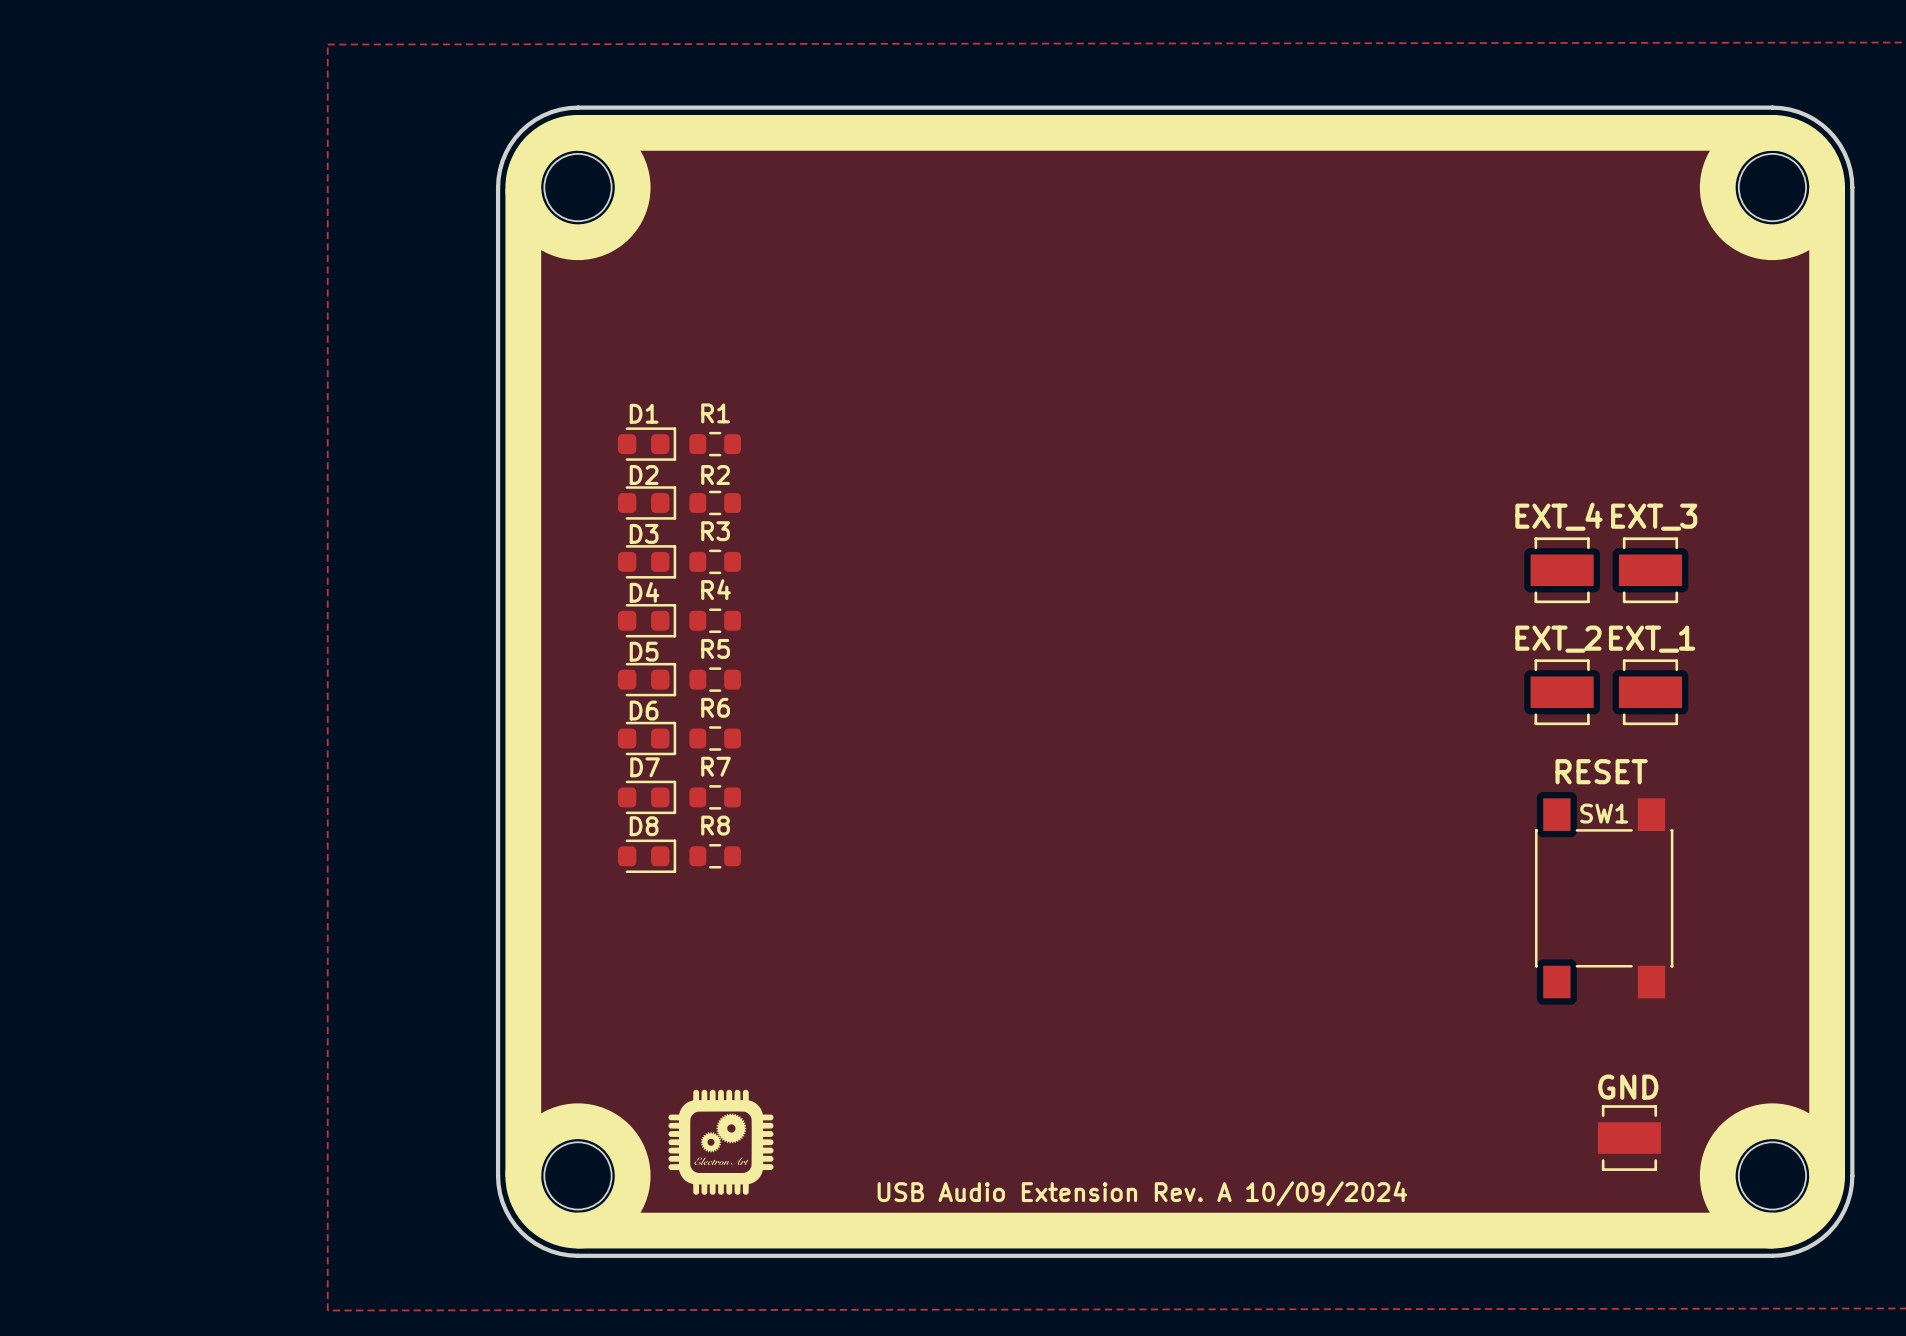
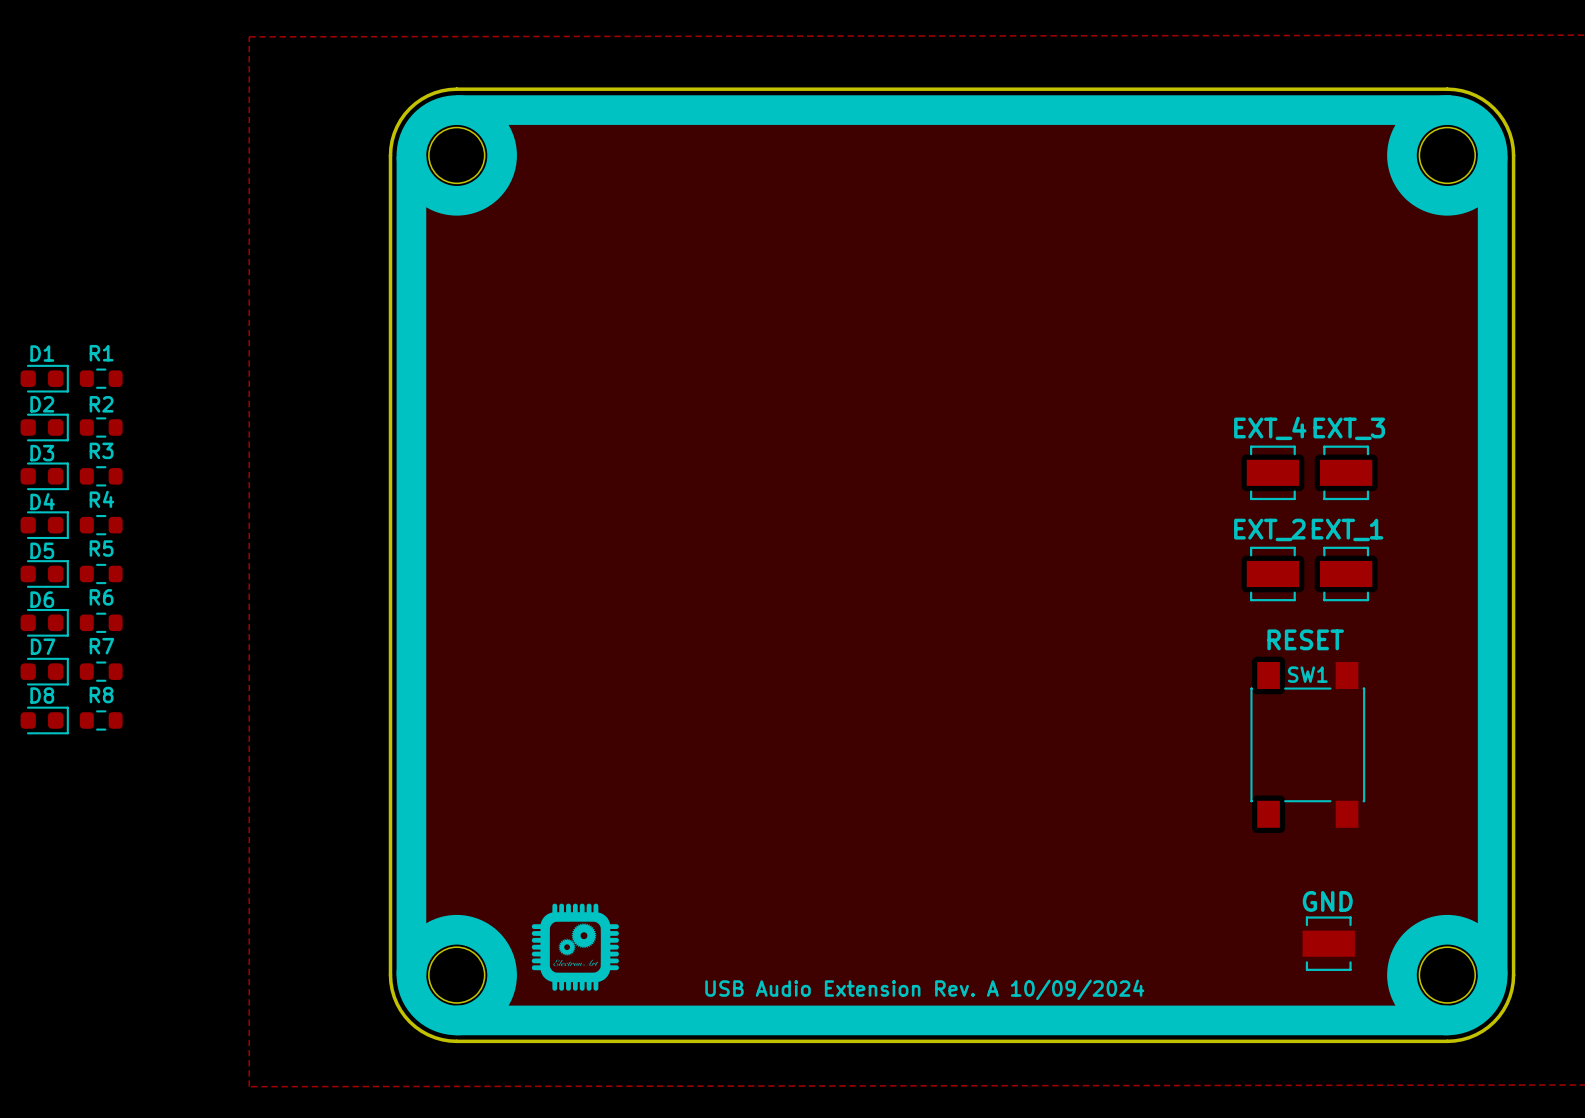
D1 position: (647, 444) -> (44, 378)
R1 position: (715, 444) -> (101, 378)
D2 position: (647, 502) -> (44, 427)
R2 position: (715, 502) -> (101, 427)
D3 position: (647, 561) -> (44, 476)
R3 position: (715, 561) -> (101, 476)
D4 position: (647, 620) -> (44, 525)
R4 position: (715, 620) -> (101, 525)
D5 position: (647, 679) -> (44, 573)
R5 position: (715, 679) -> (101, 573)
D6 position: (647, 738) -> (44, 622)
R6 position: (715, 738) -> (101, 622)
D7 position: (647, 797) -> (44, 671)
R7 position: (715, 797) -> (101, 671)
D8 position: (647, 856) -> (44, 720)
R8 position: (715, 856) -> (101, 720)

